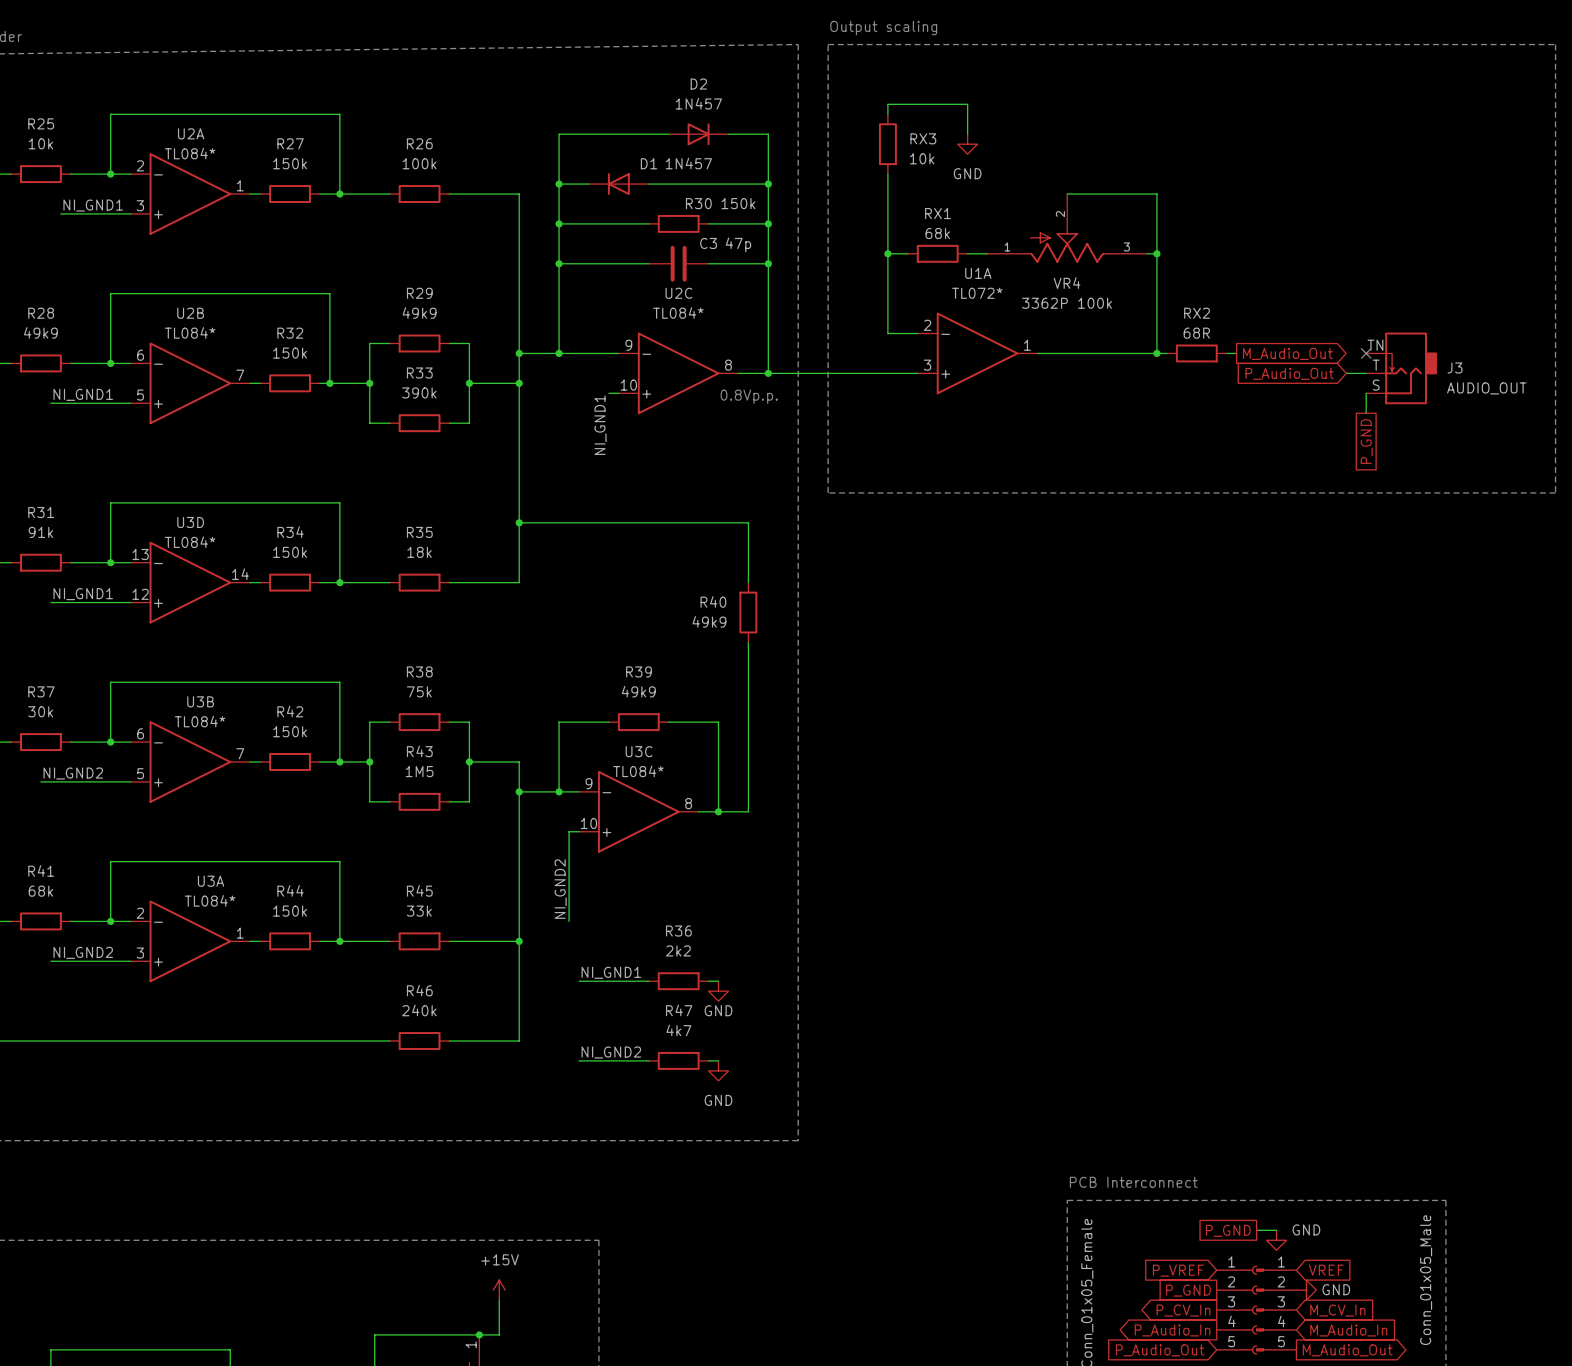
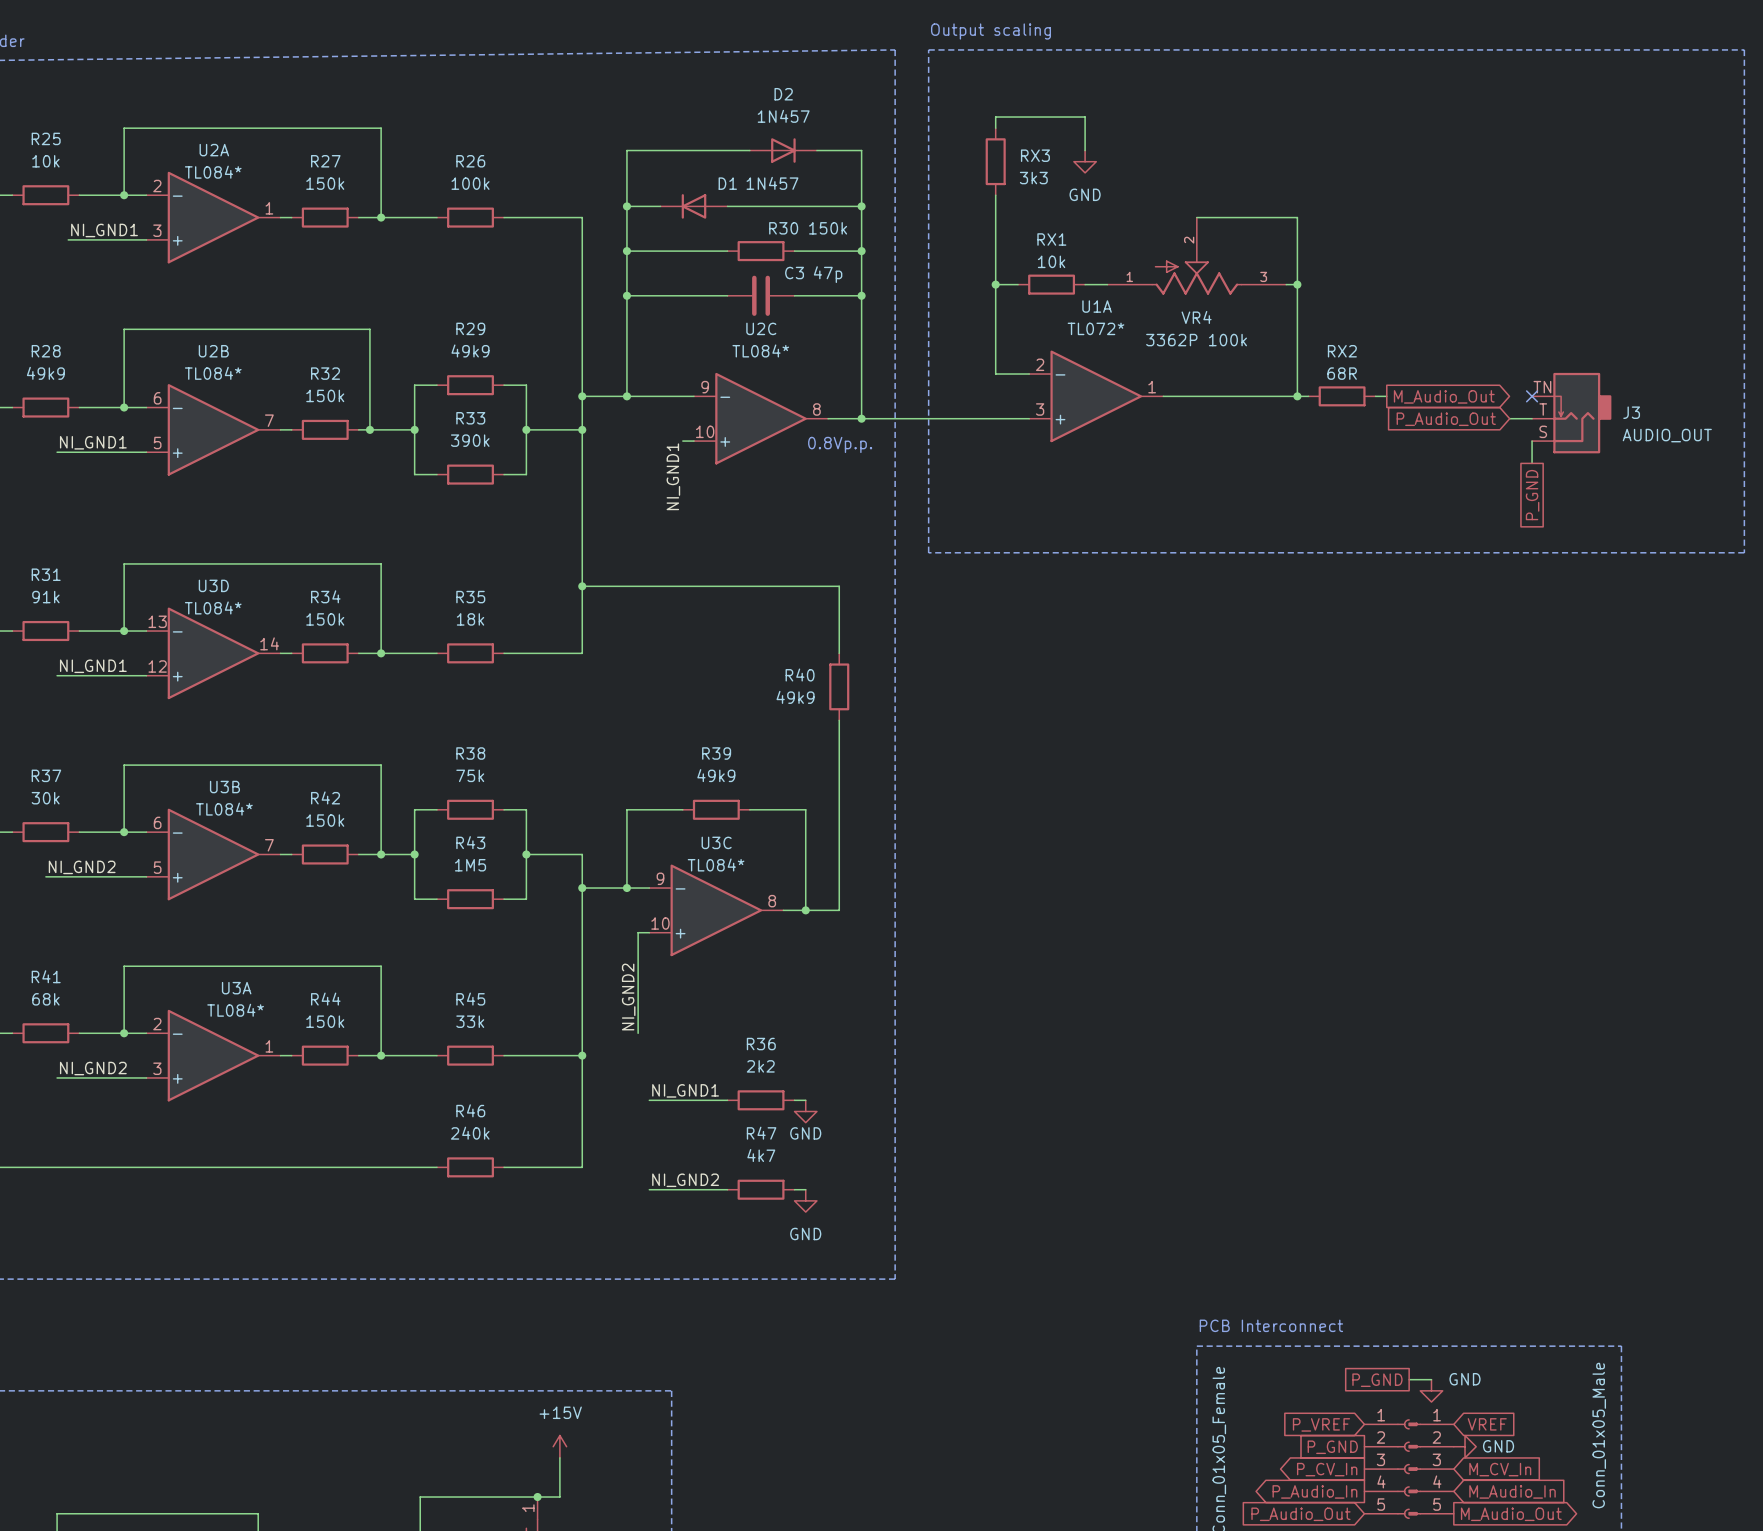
RX3 value: 10k (922, 158) -> 3k3 (1033, 178)
RX1 value: 68k (937, 233) -> 10k (1051, 261)

